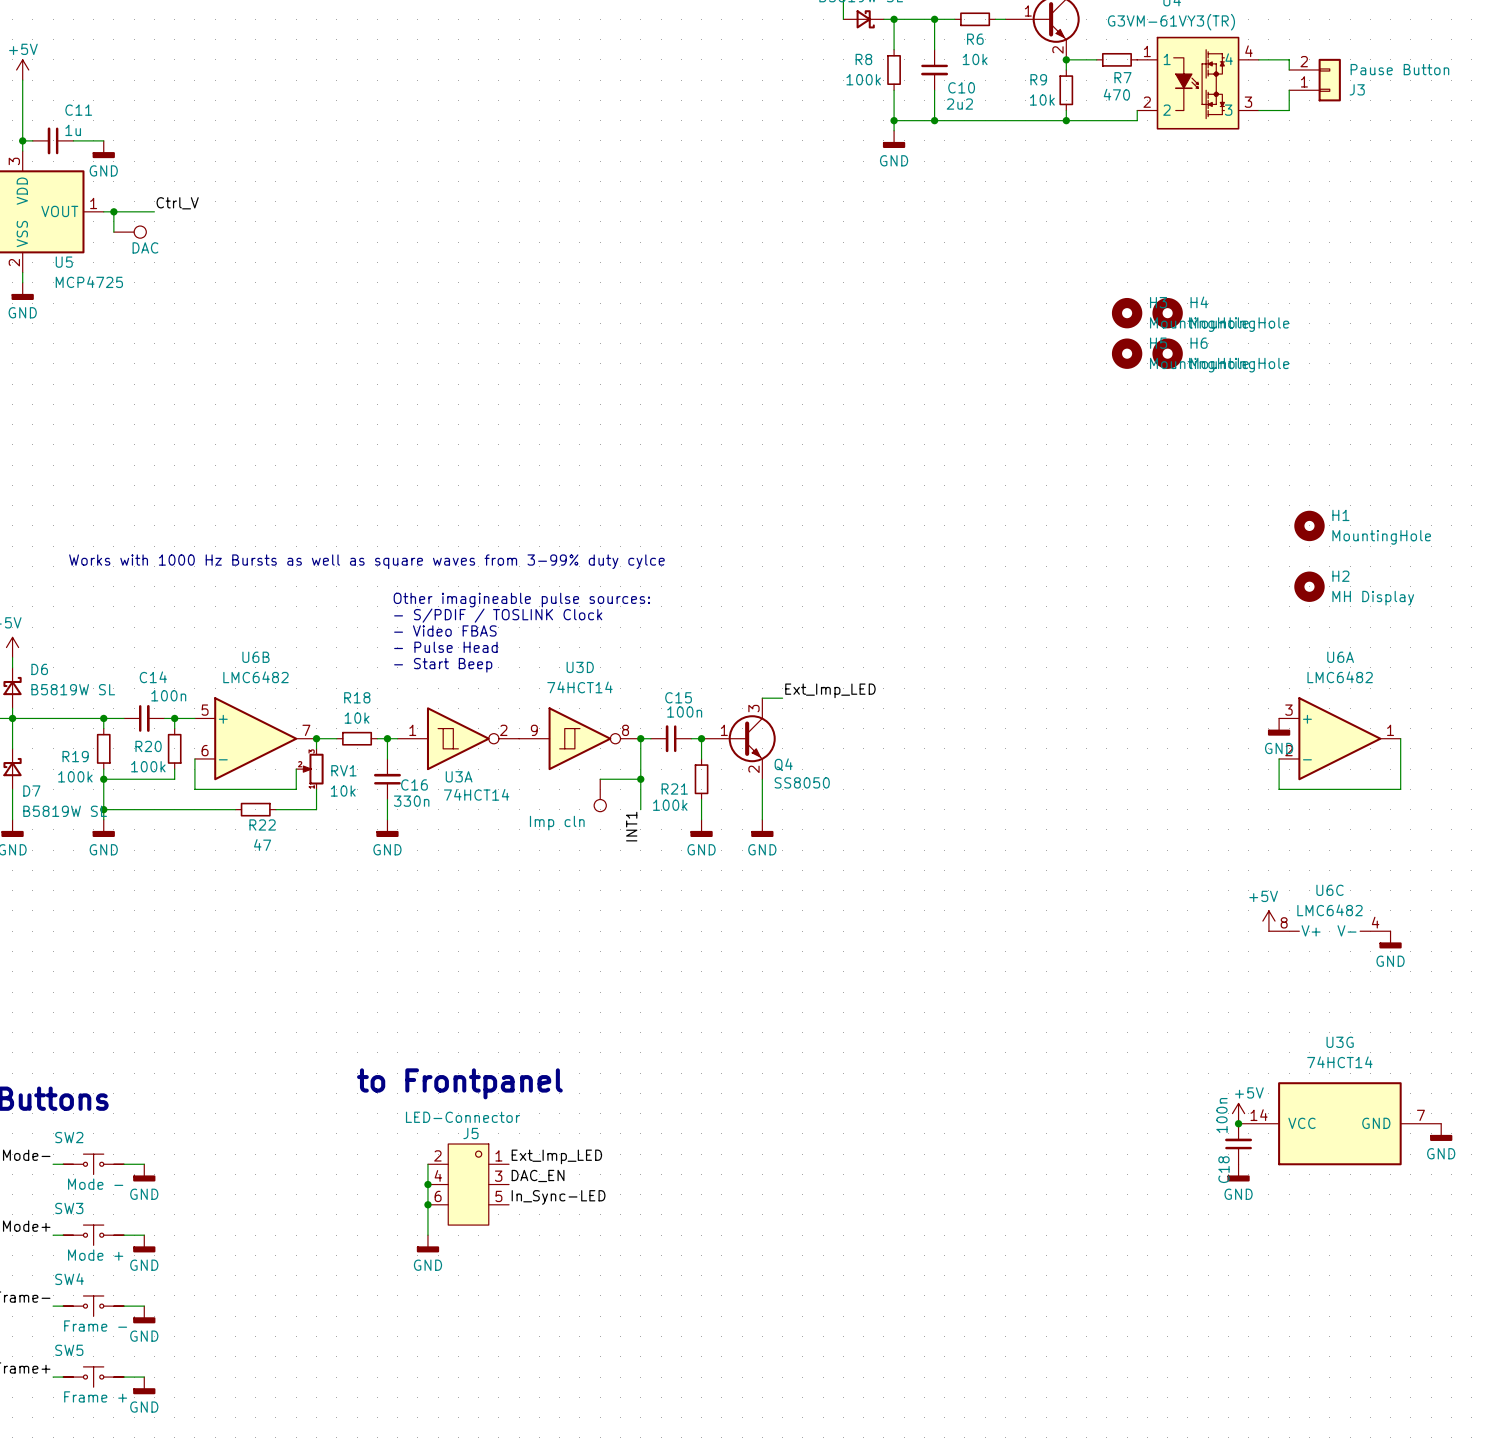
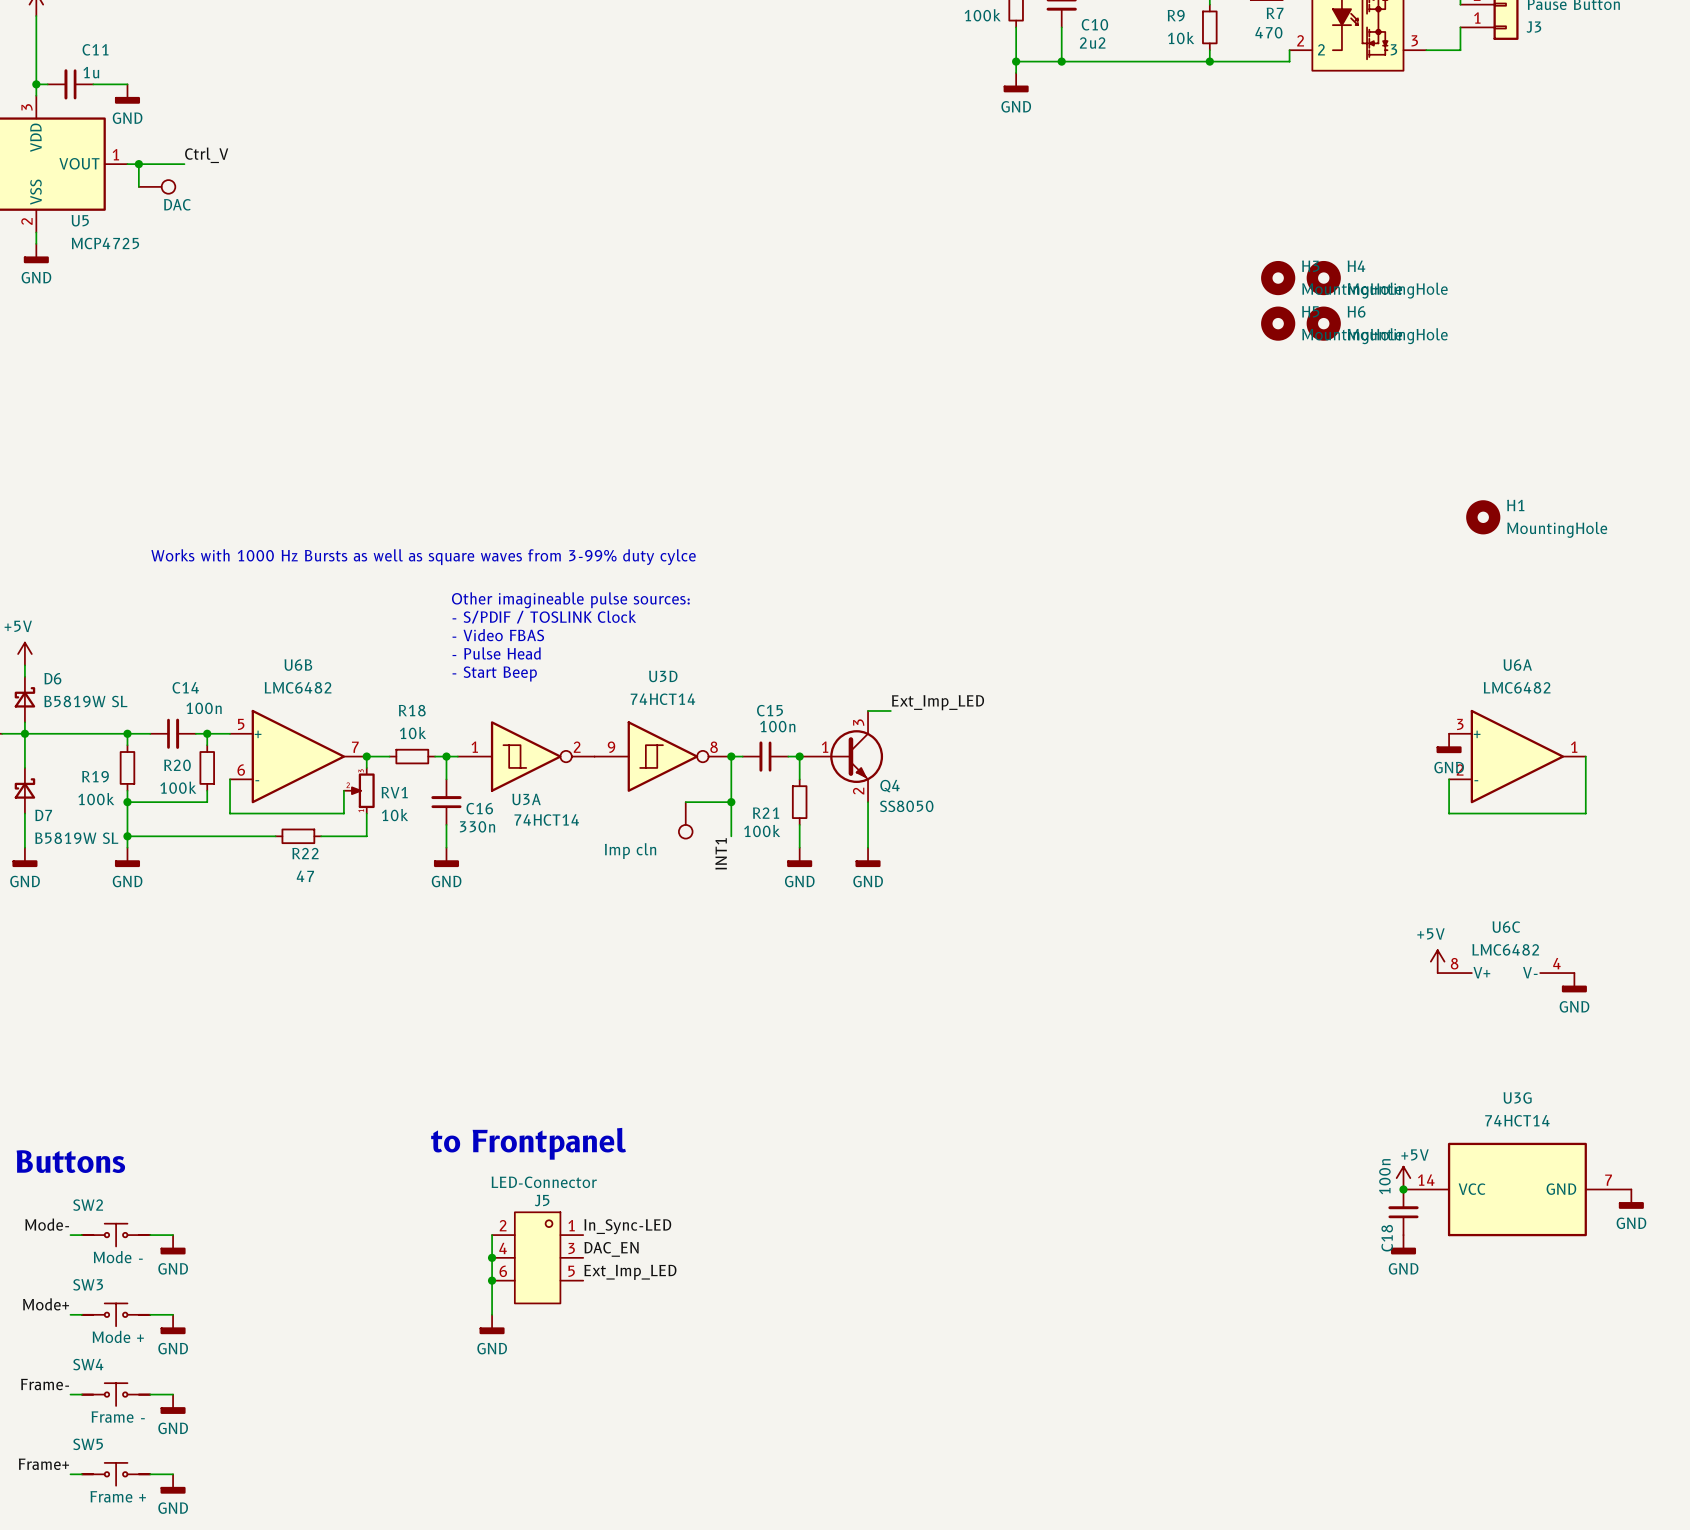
H2: MH Display (1309, 586) -> none
label: Ext_Imp_LED (556, 1156) -> In_Sync-LED (627, 1226)
label: In_Sync-LED (558, 1197) -> Ext_Imp_LED (630, 1272)

